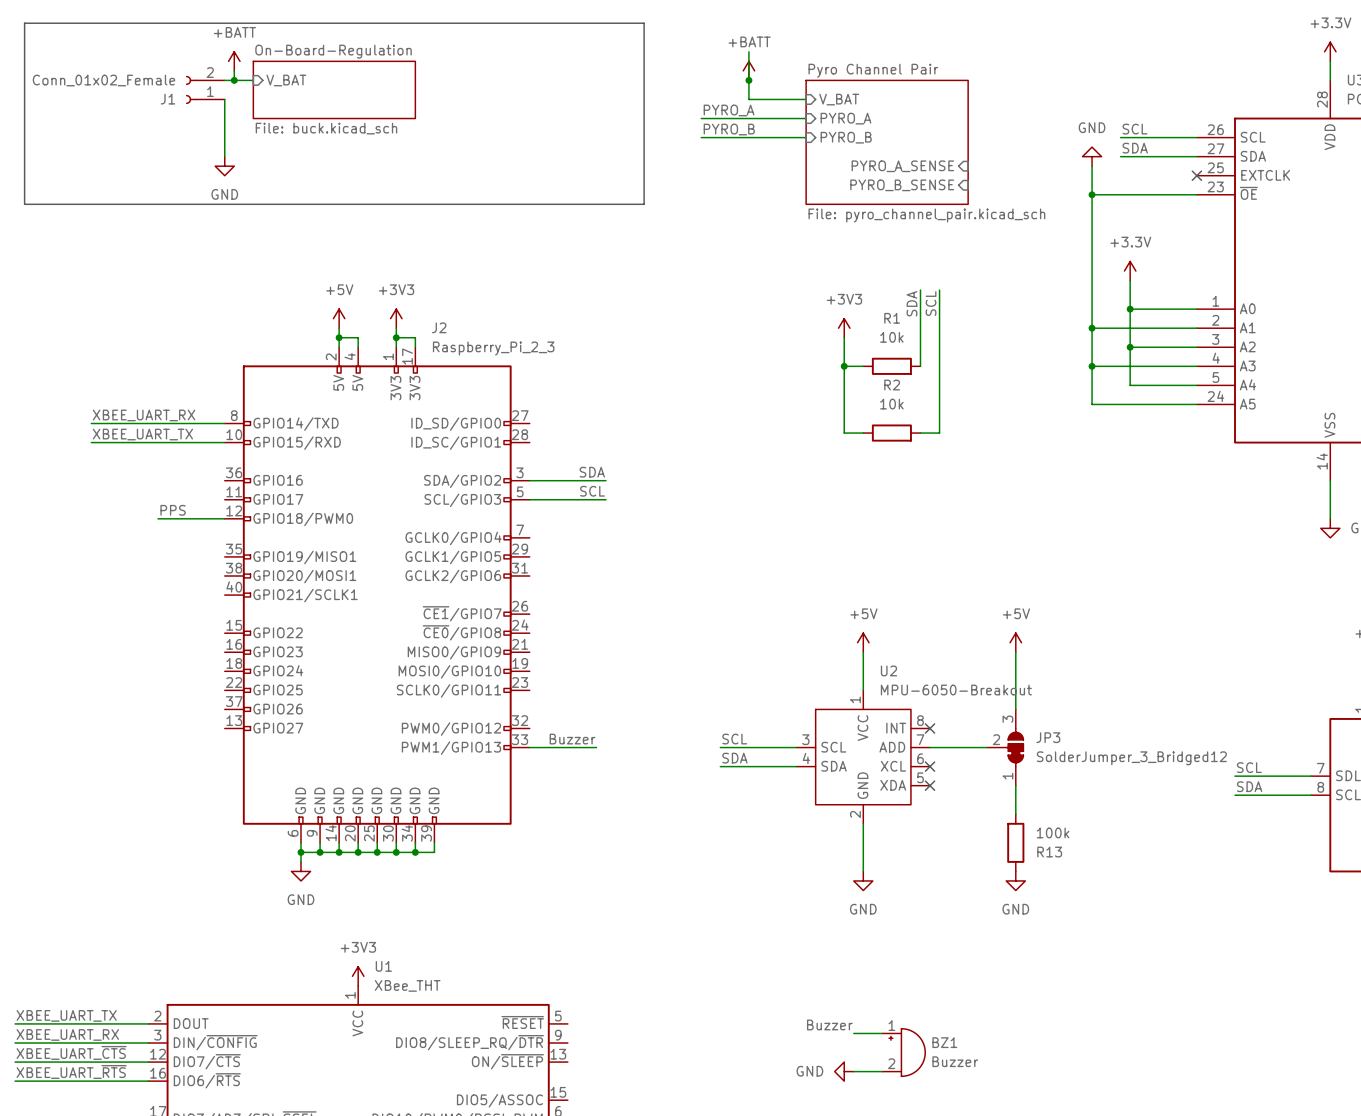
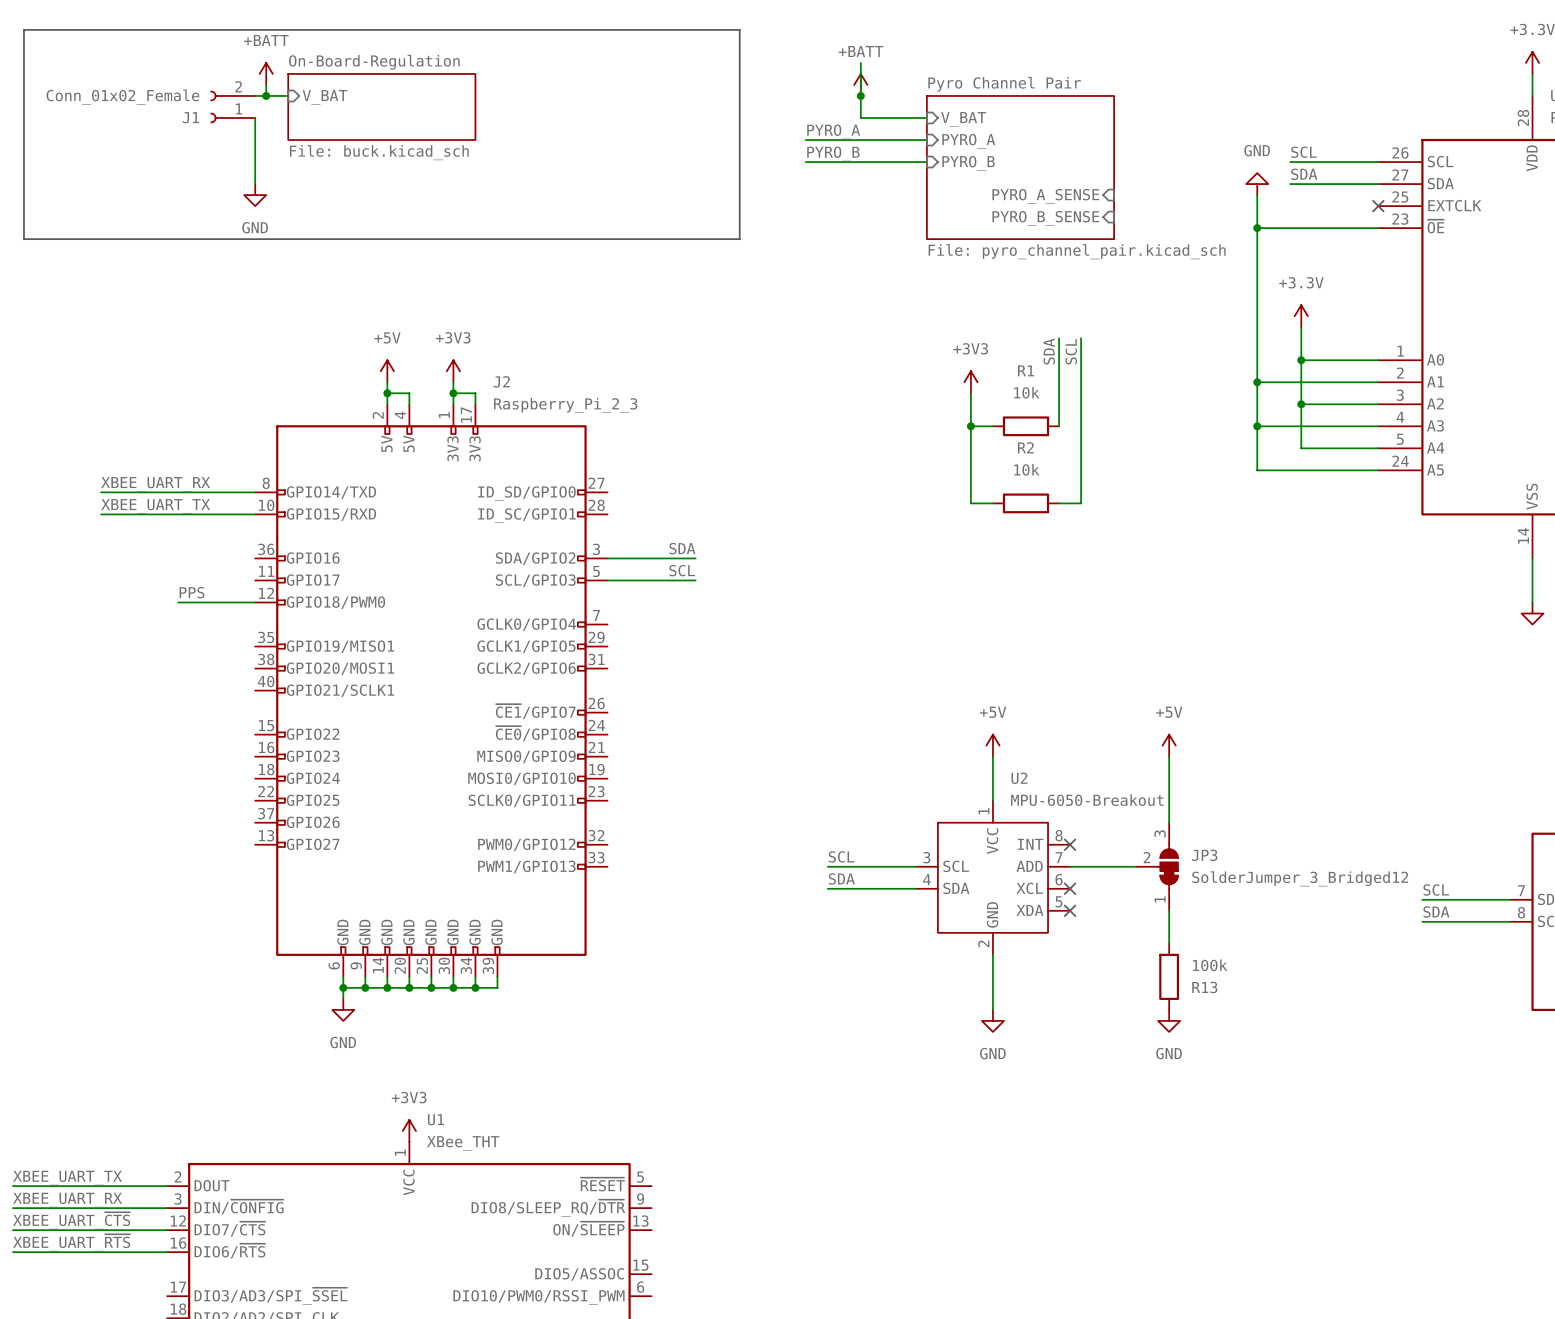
label: Buzzer (572, 739) -> none
wire: (529, 747) (596, 747) -> none
label: Buzzer (829, 1024) -> none
wire: (853, 1033) (882, 1033) -> none
BZ1: Buzzer (903, 1052) -> none
power symbol: GND (844, 1071) -> none
wire: (853, 1071) (882, 1071) -> none

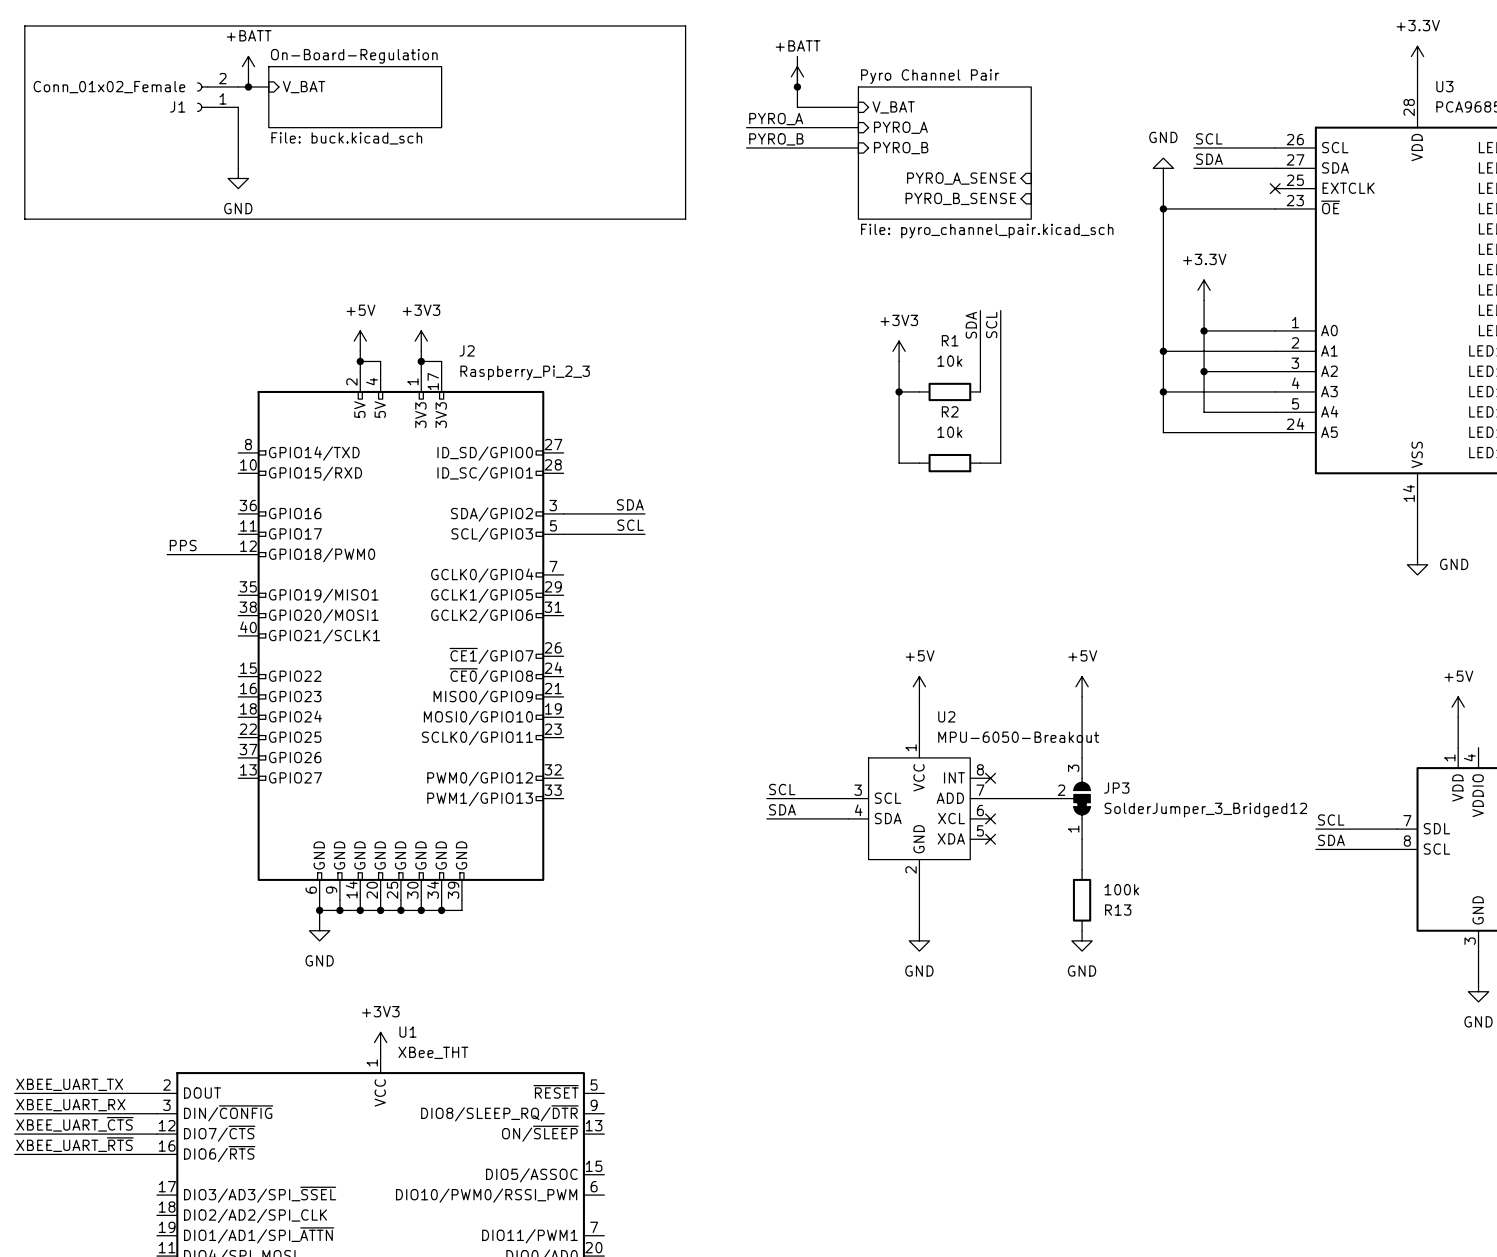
label: XBEE_UART_RX (155, 484) -> none
wire: (101, 492) (255, 492) -> none
label: XBEE_UART_TX (155, 506) -> none
wire: (101, 514) (255, 514) -> none

